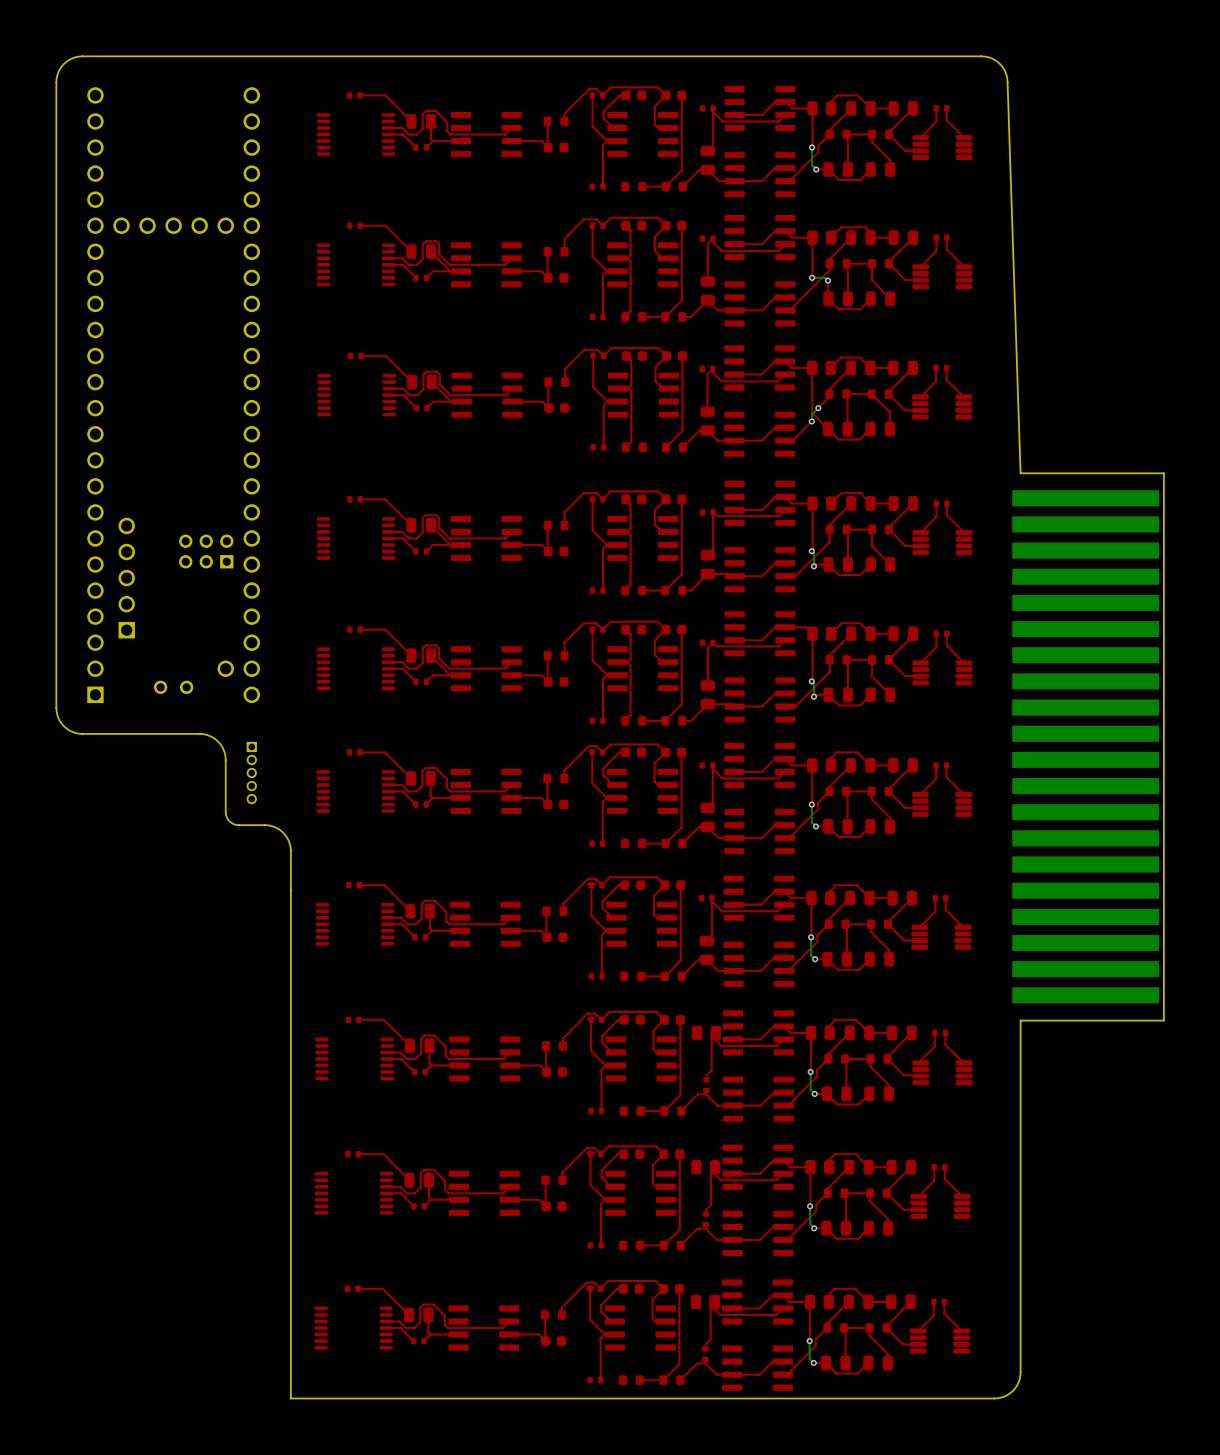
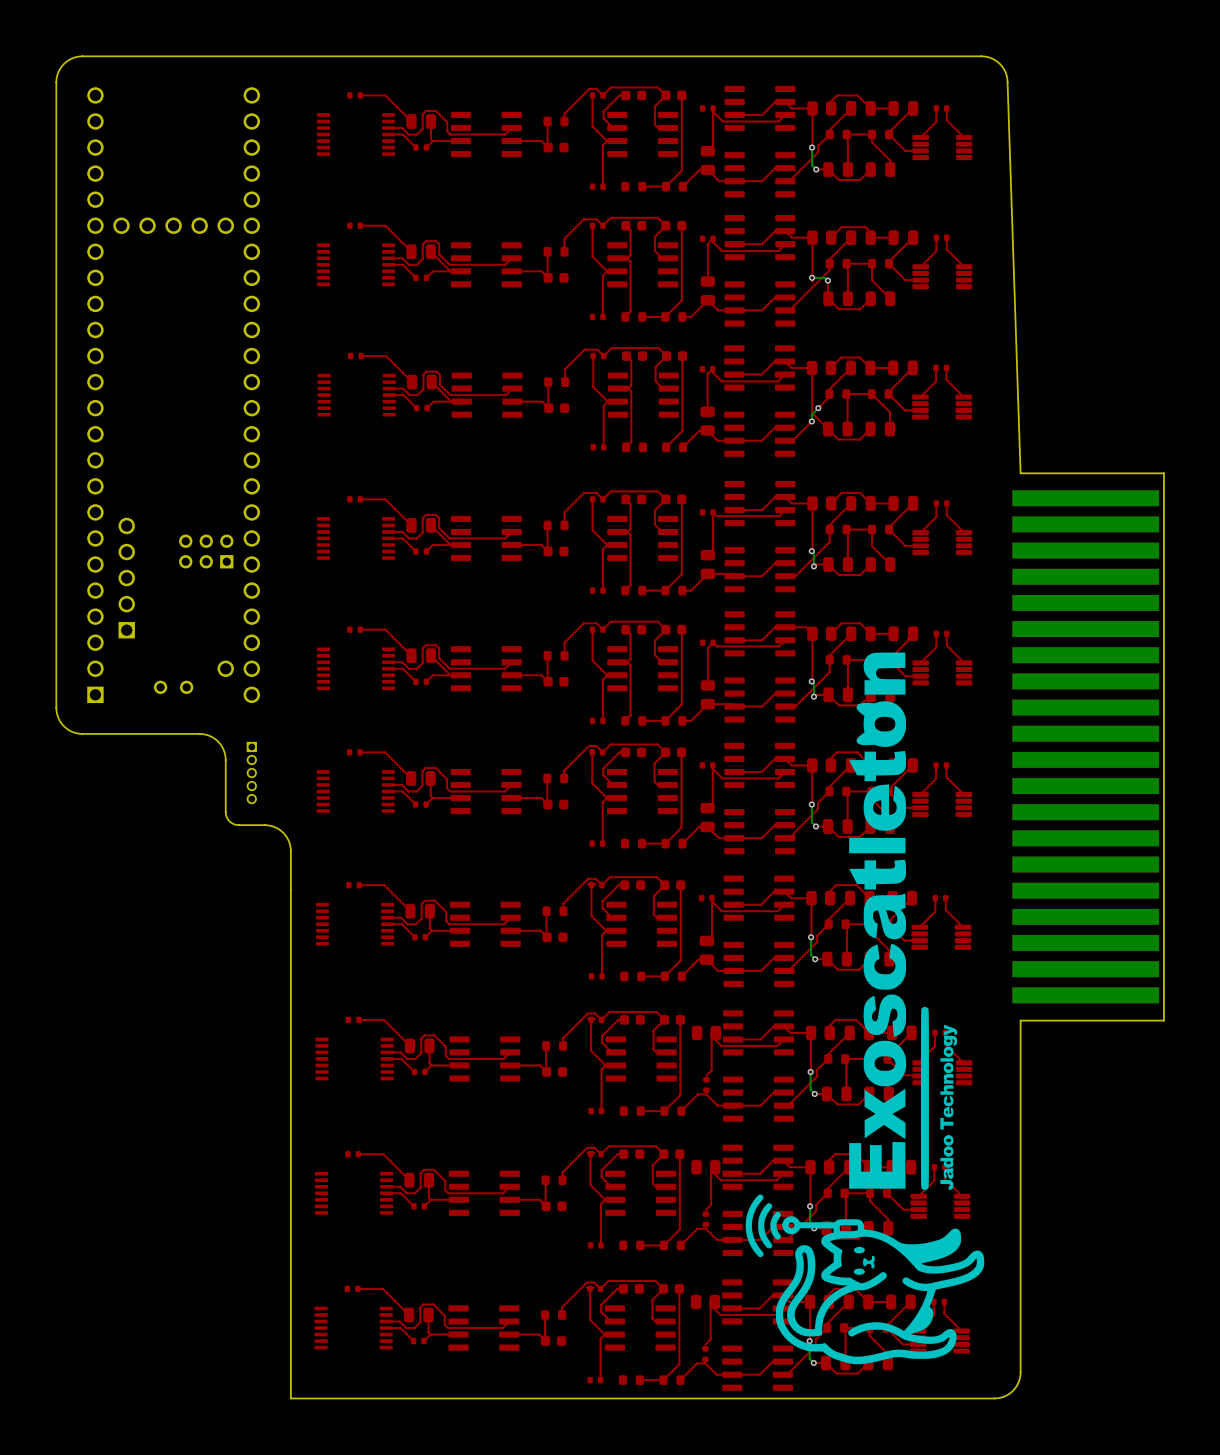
drawing: none -> [745, 652, 985, 1365]

